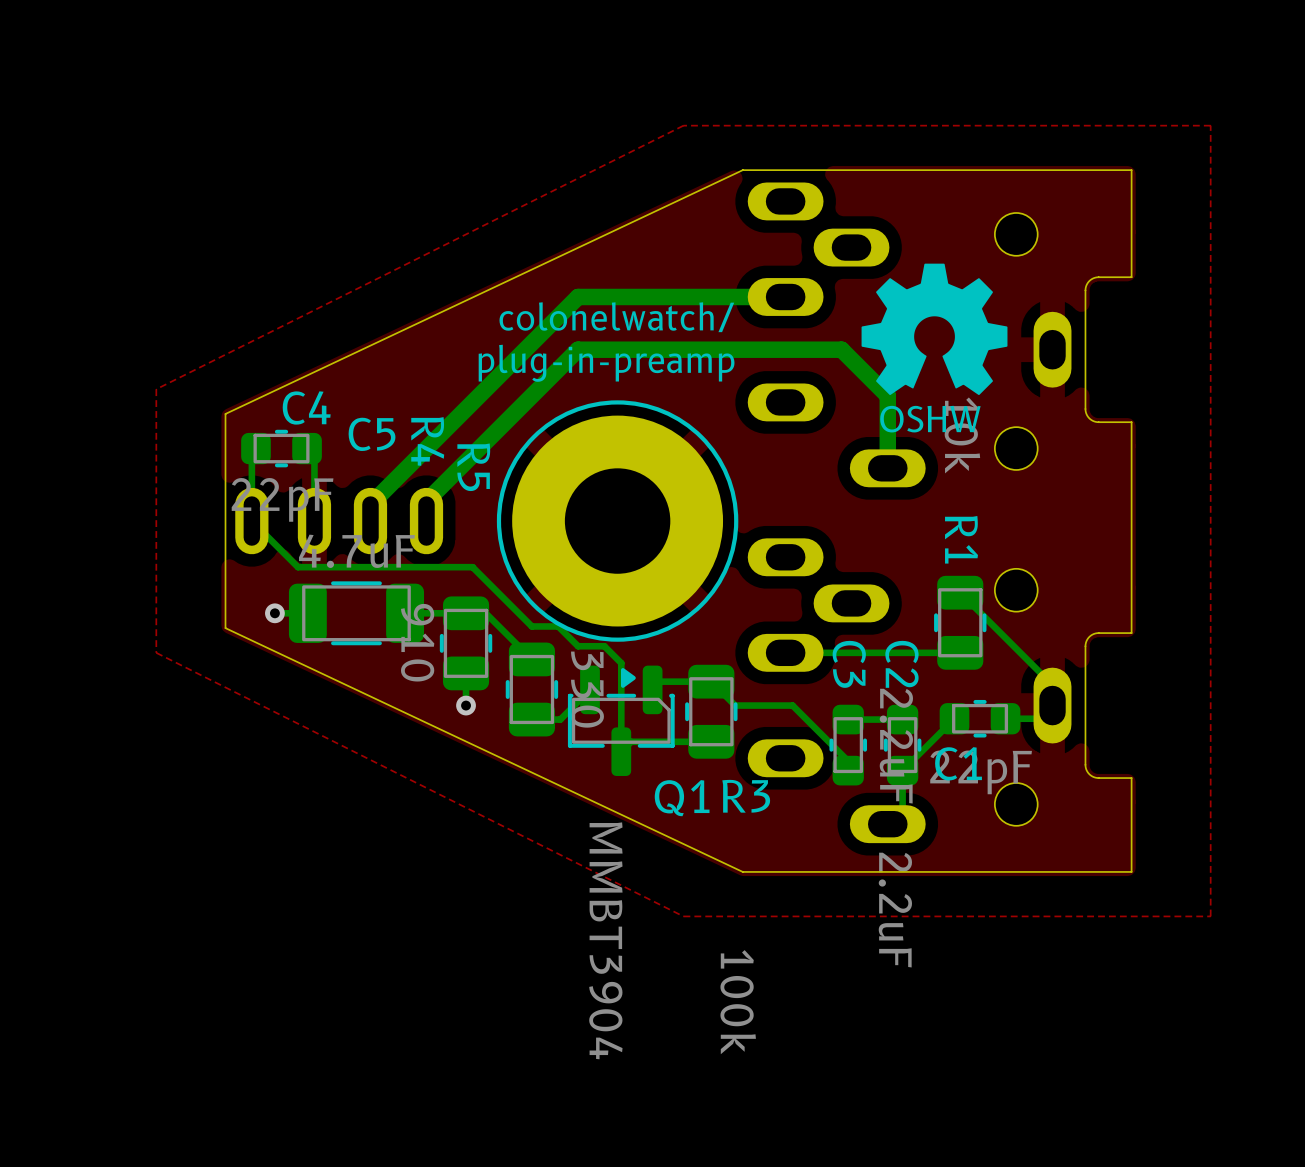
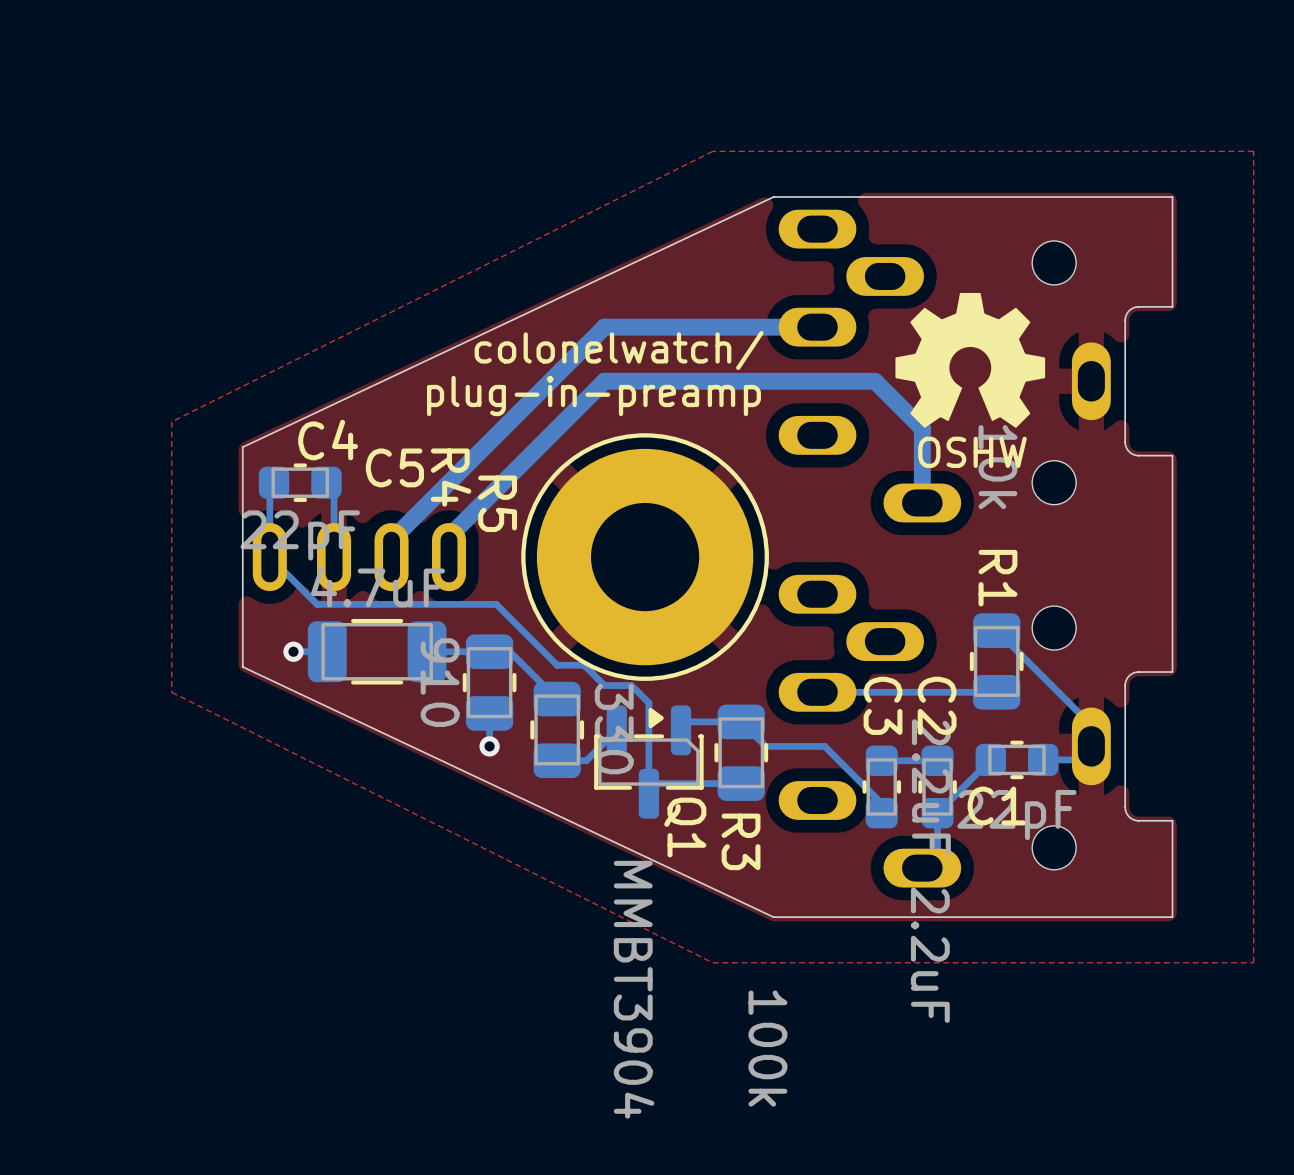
R3 name rotation: 0° (746, 796) -> 90° clockwise (741, 841)
Q1 name rotation: 0° (682, 798) -> 90° clockwise (685, 827)

